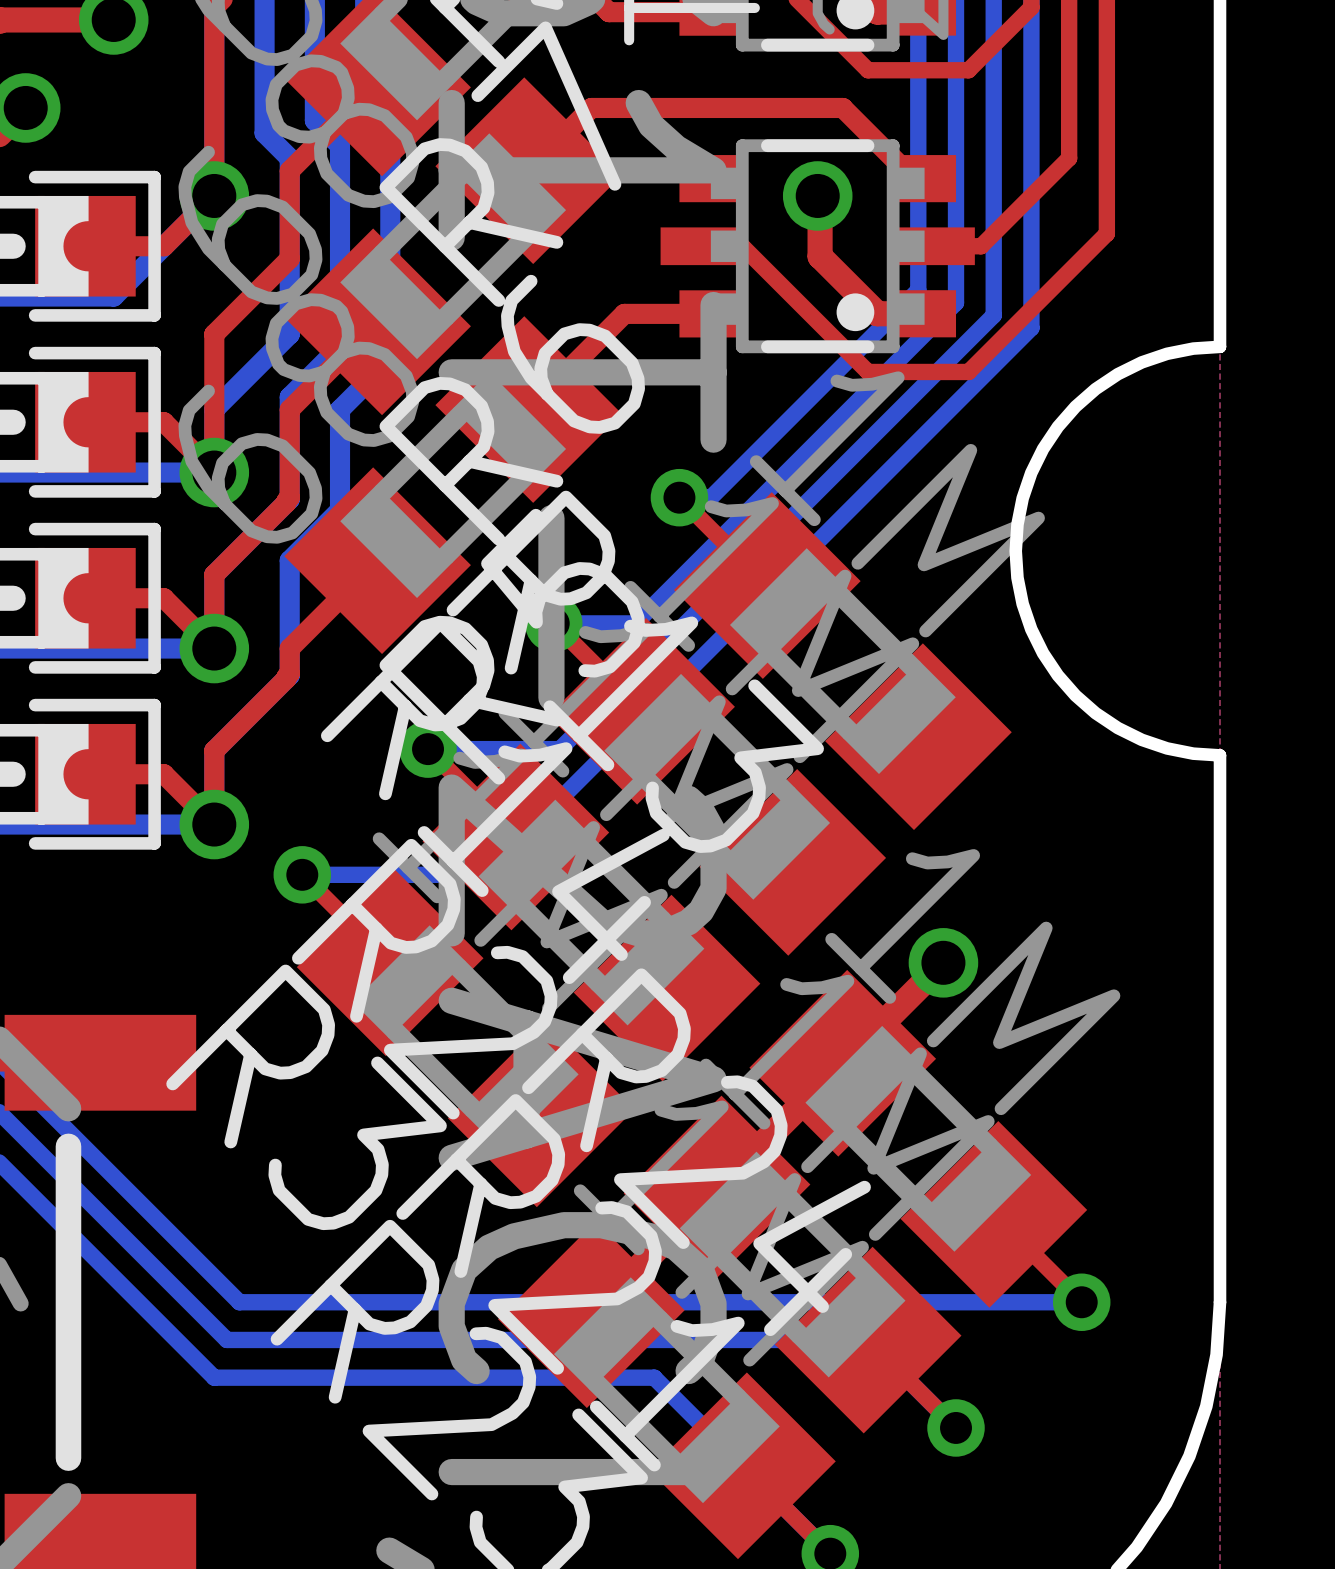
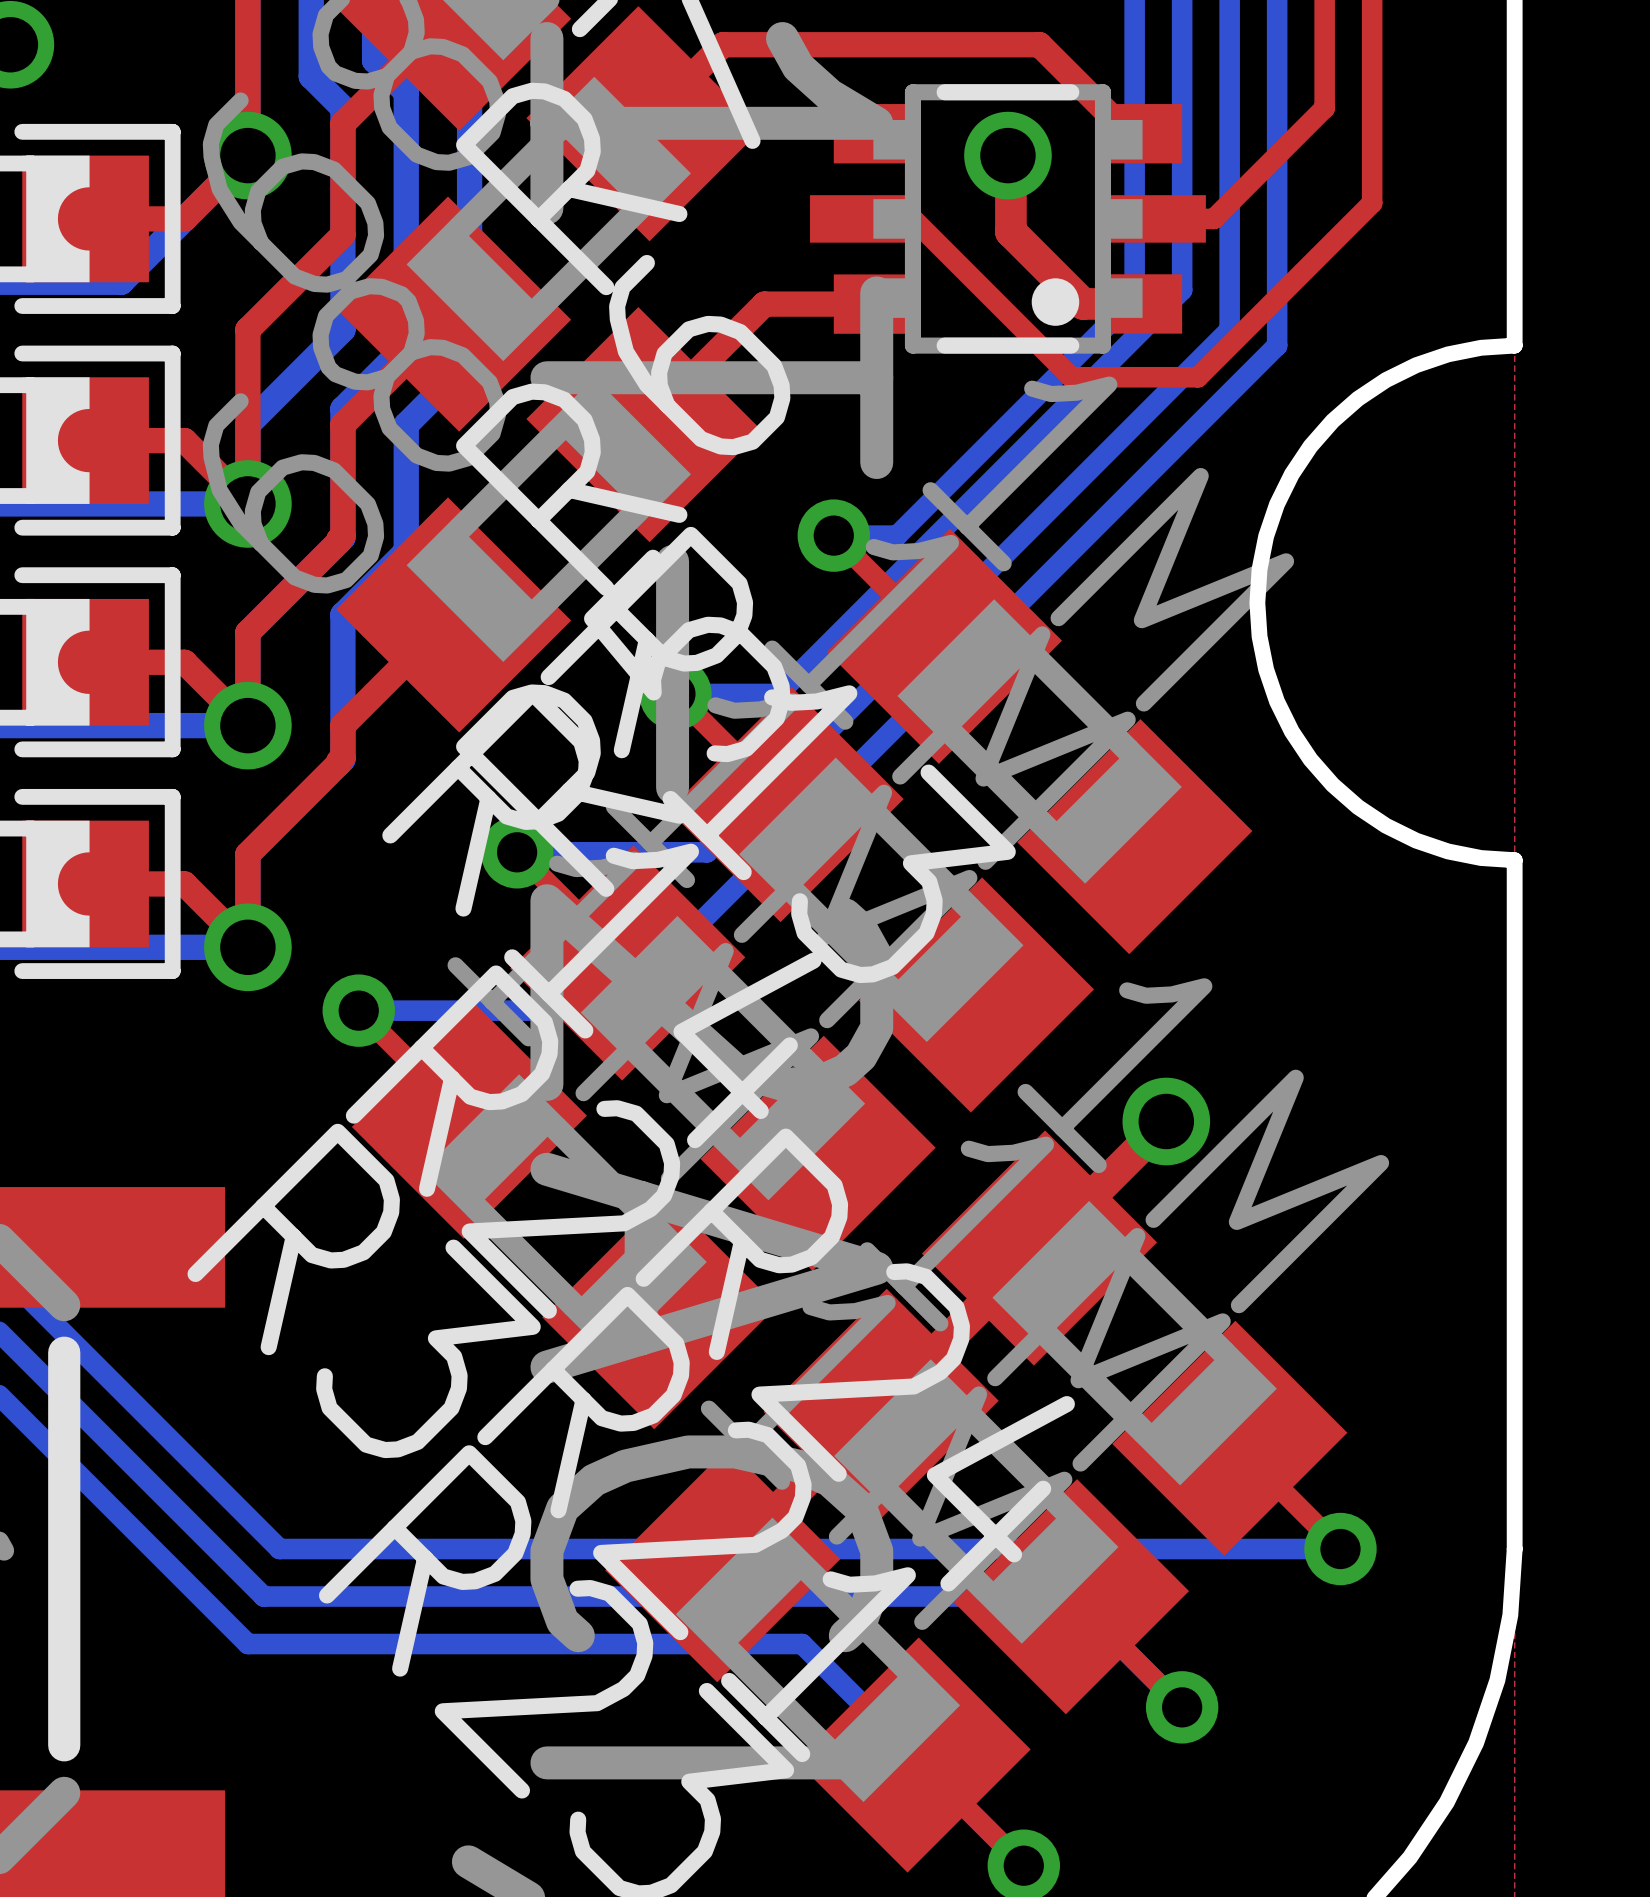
bottom track: (918, 290) (710, 497) -> (1134, 274) (1134, 298) (897, 535) (873, 535)
bottom track: (993, 315) (560, 749) -> (1229, 306) (1229, 329) (707, 852) (683, 852)
bottom track: (1031, 327) (484, 874) -> (1277, 321) (1277, 345) (612, 1010) (588, 1010)

